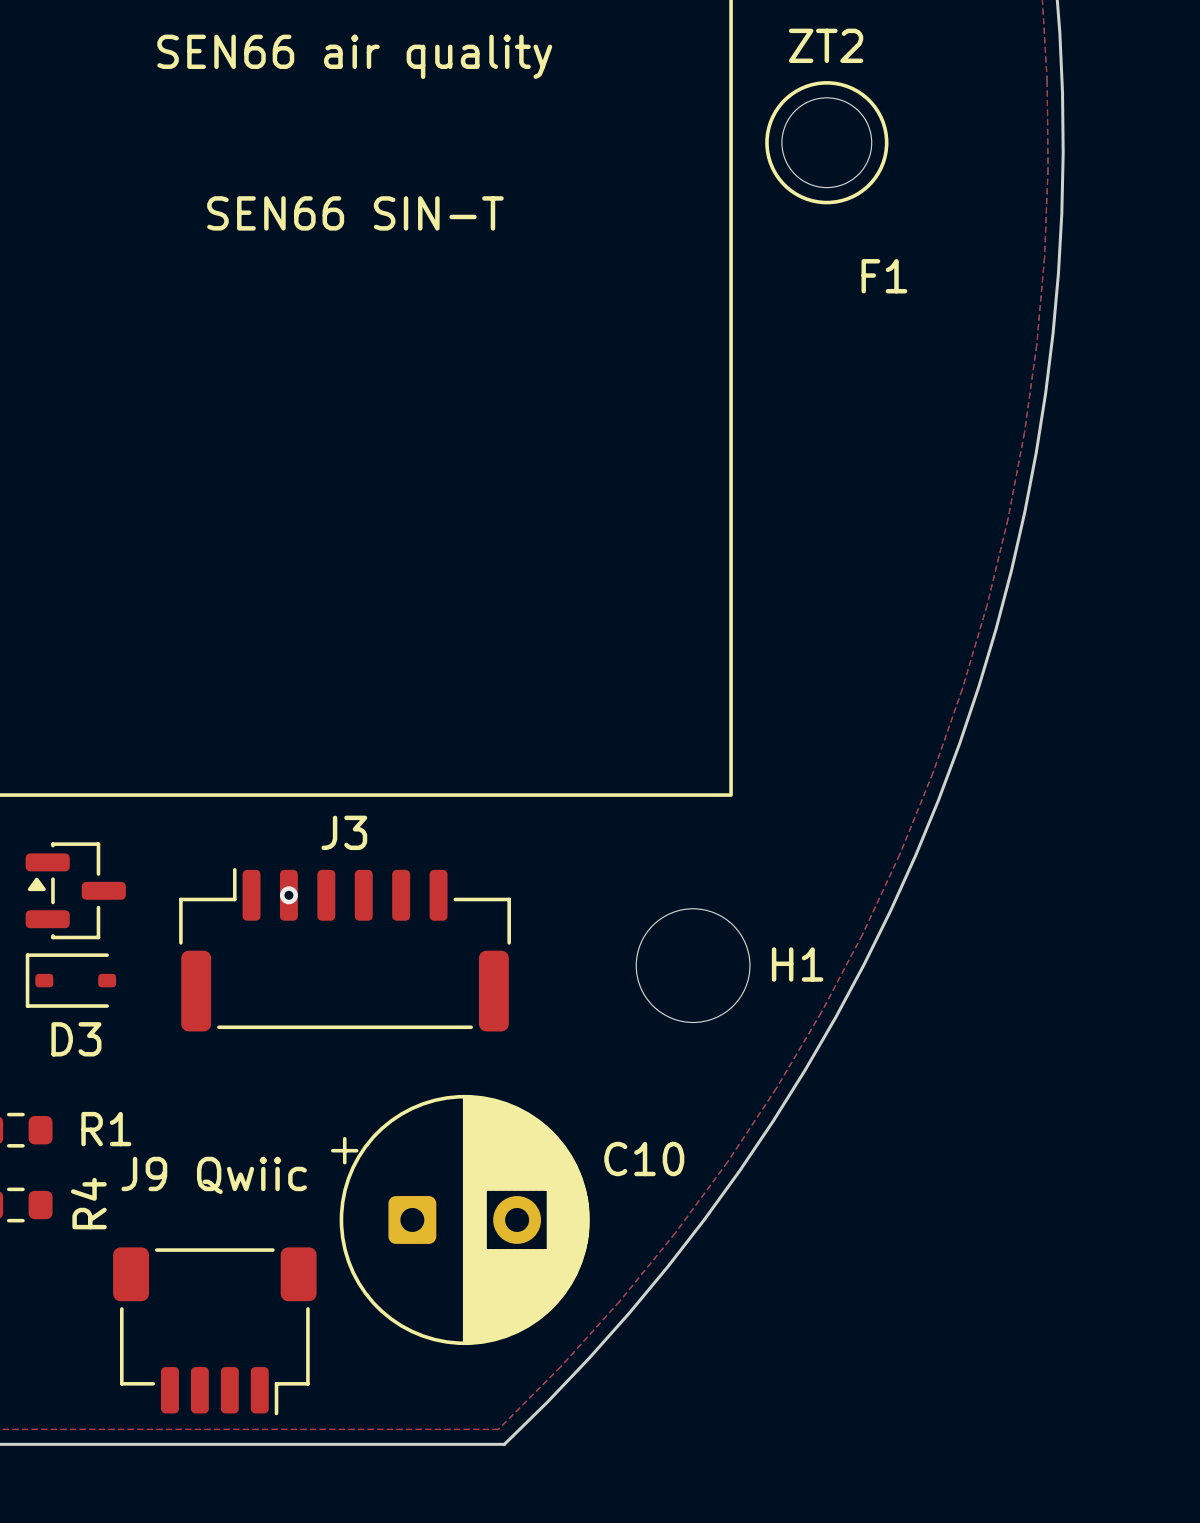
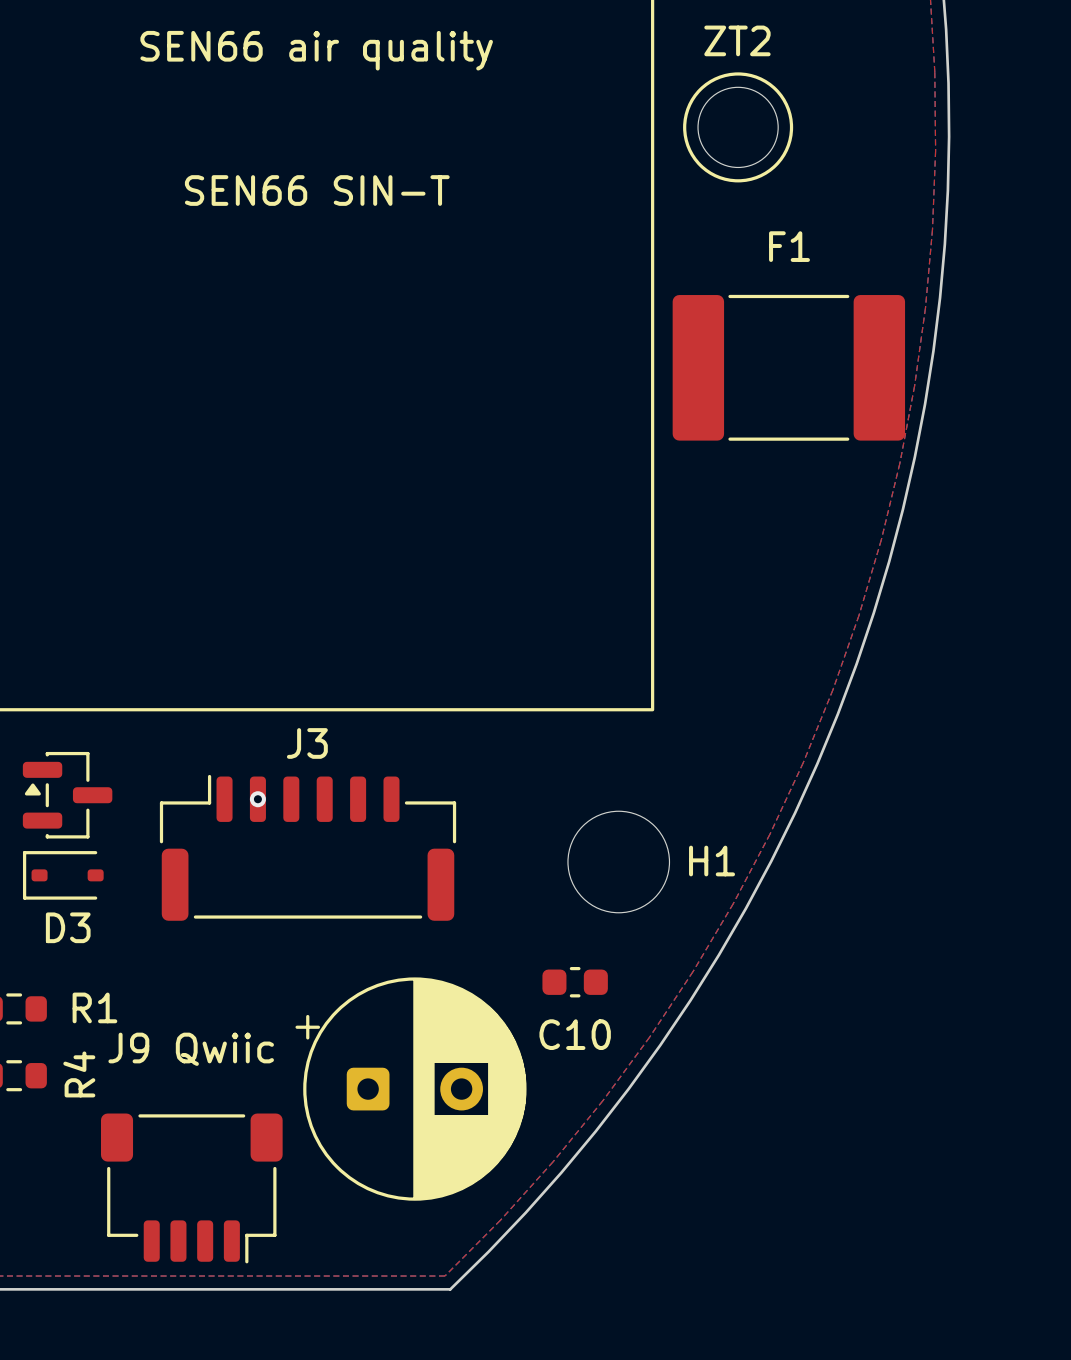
part: none -> (788, 367)
part: none -> (575, 982)

